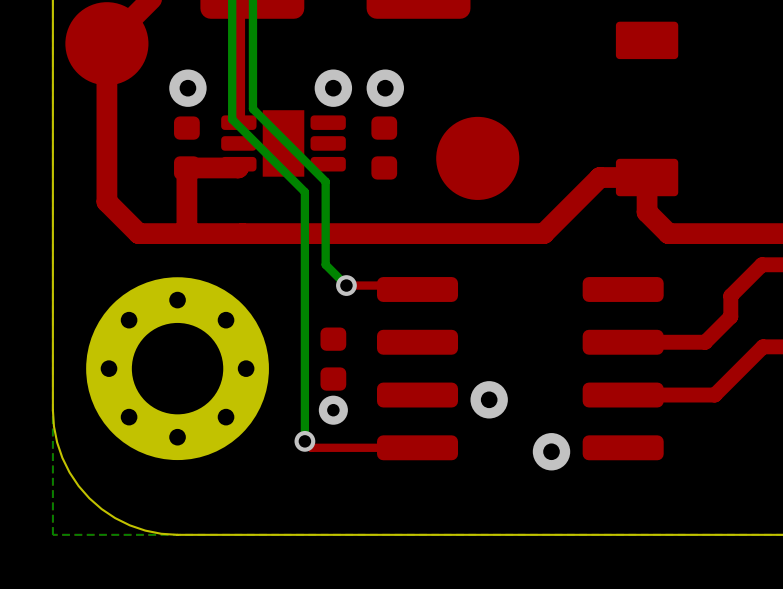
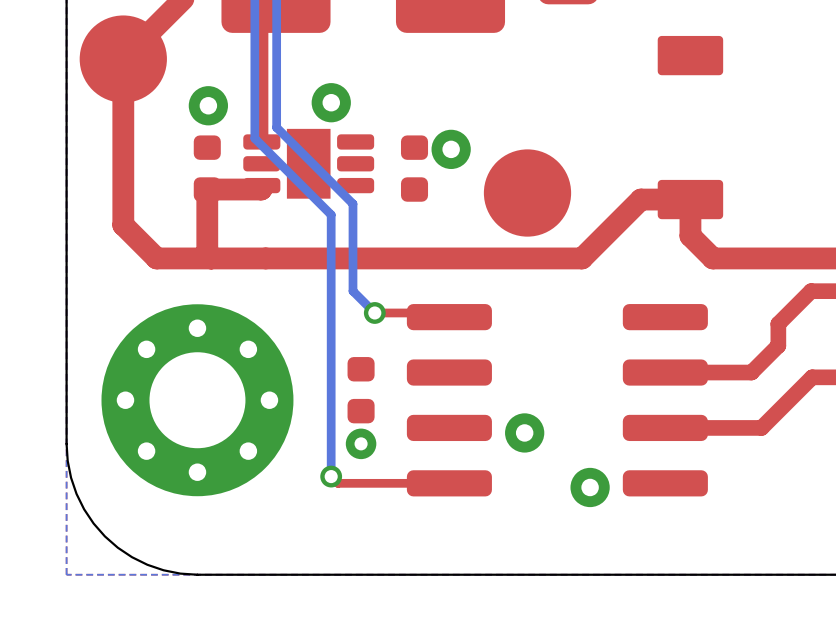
via position: (333, 88) -> (331, 102)
via: (385, 88) -> none
via: none -> (451, 149)
part position: (477, 158) -> (527, 193)

